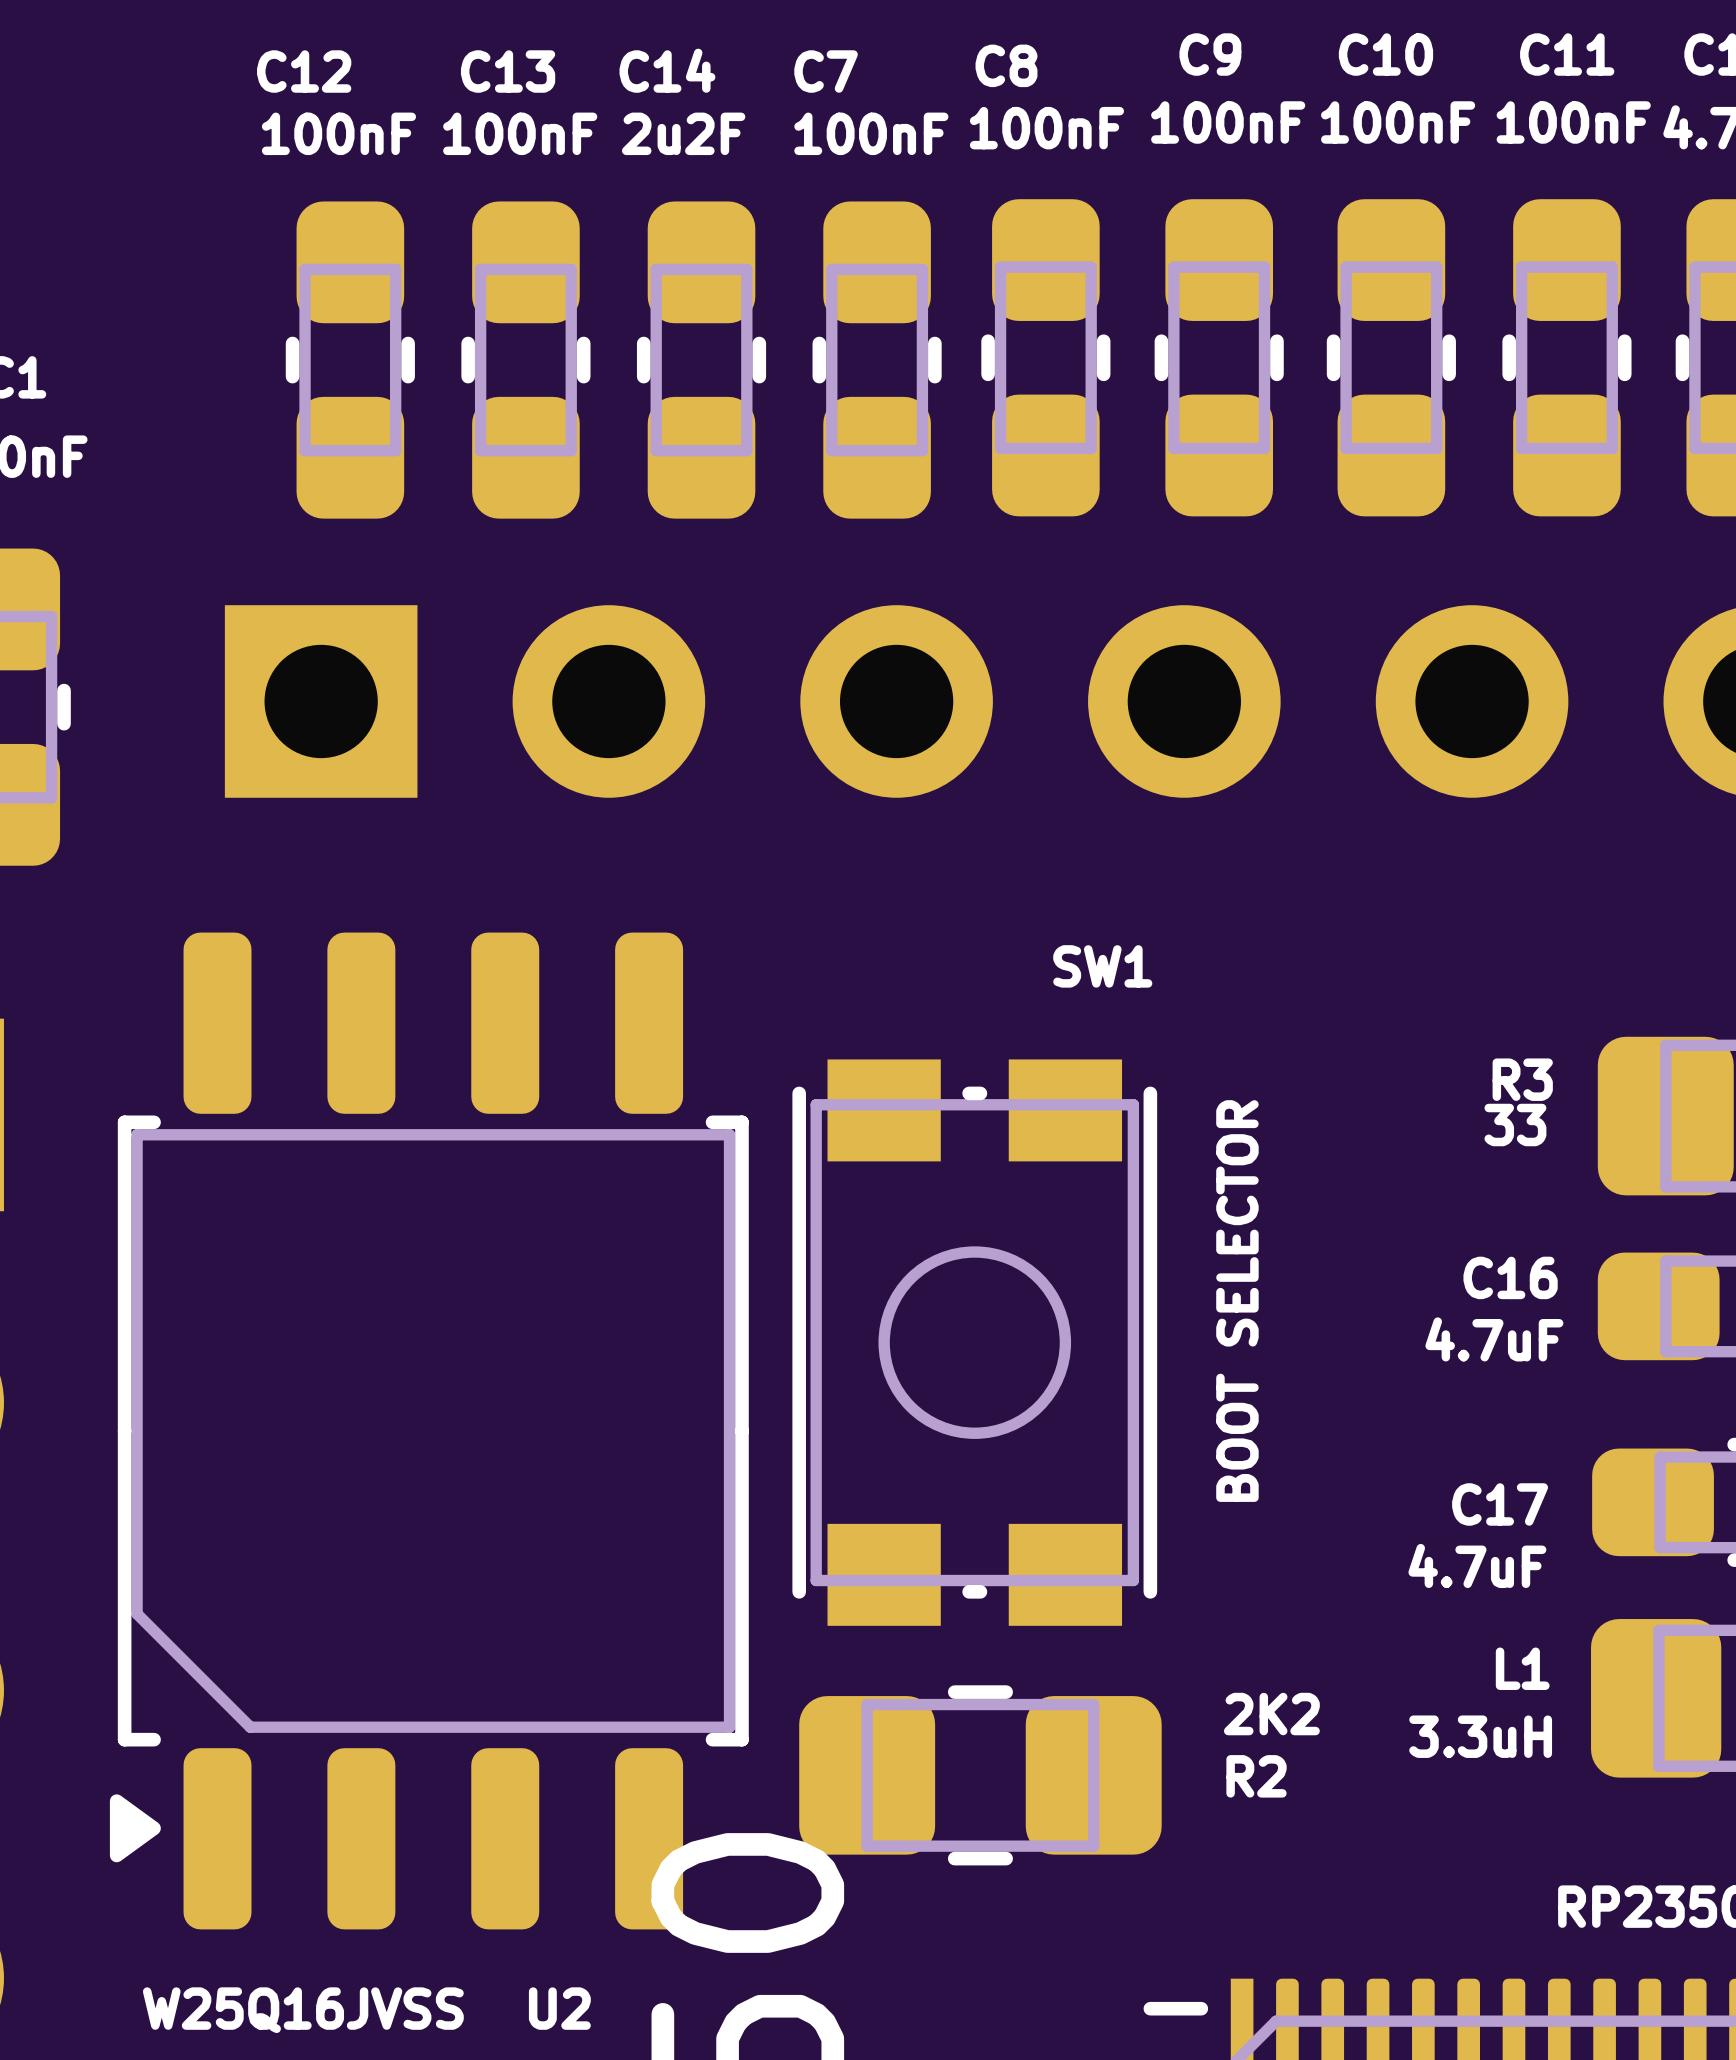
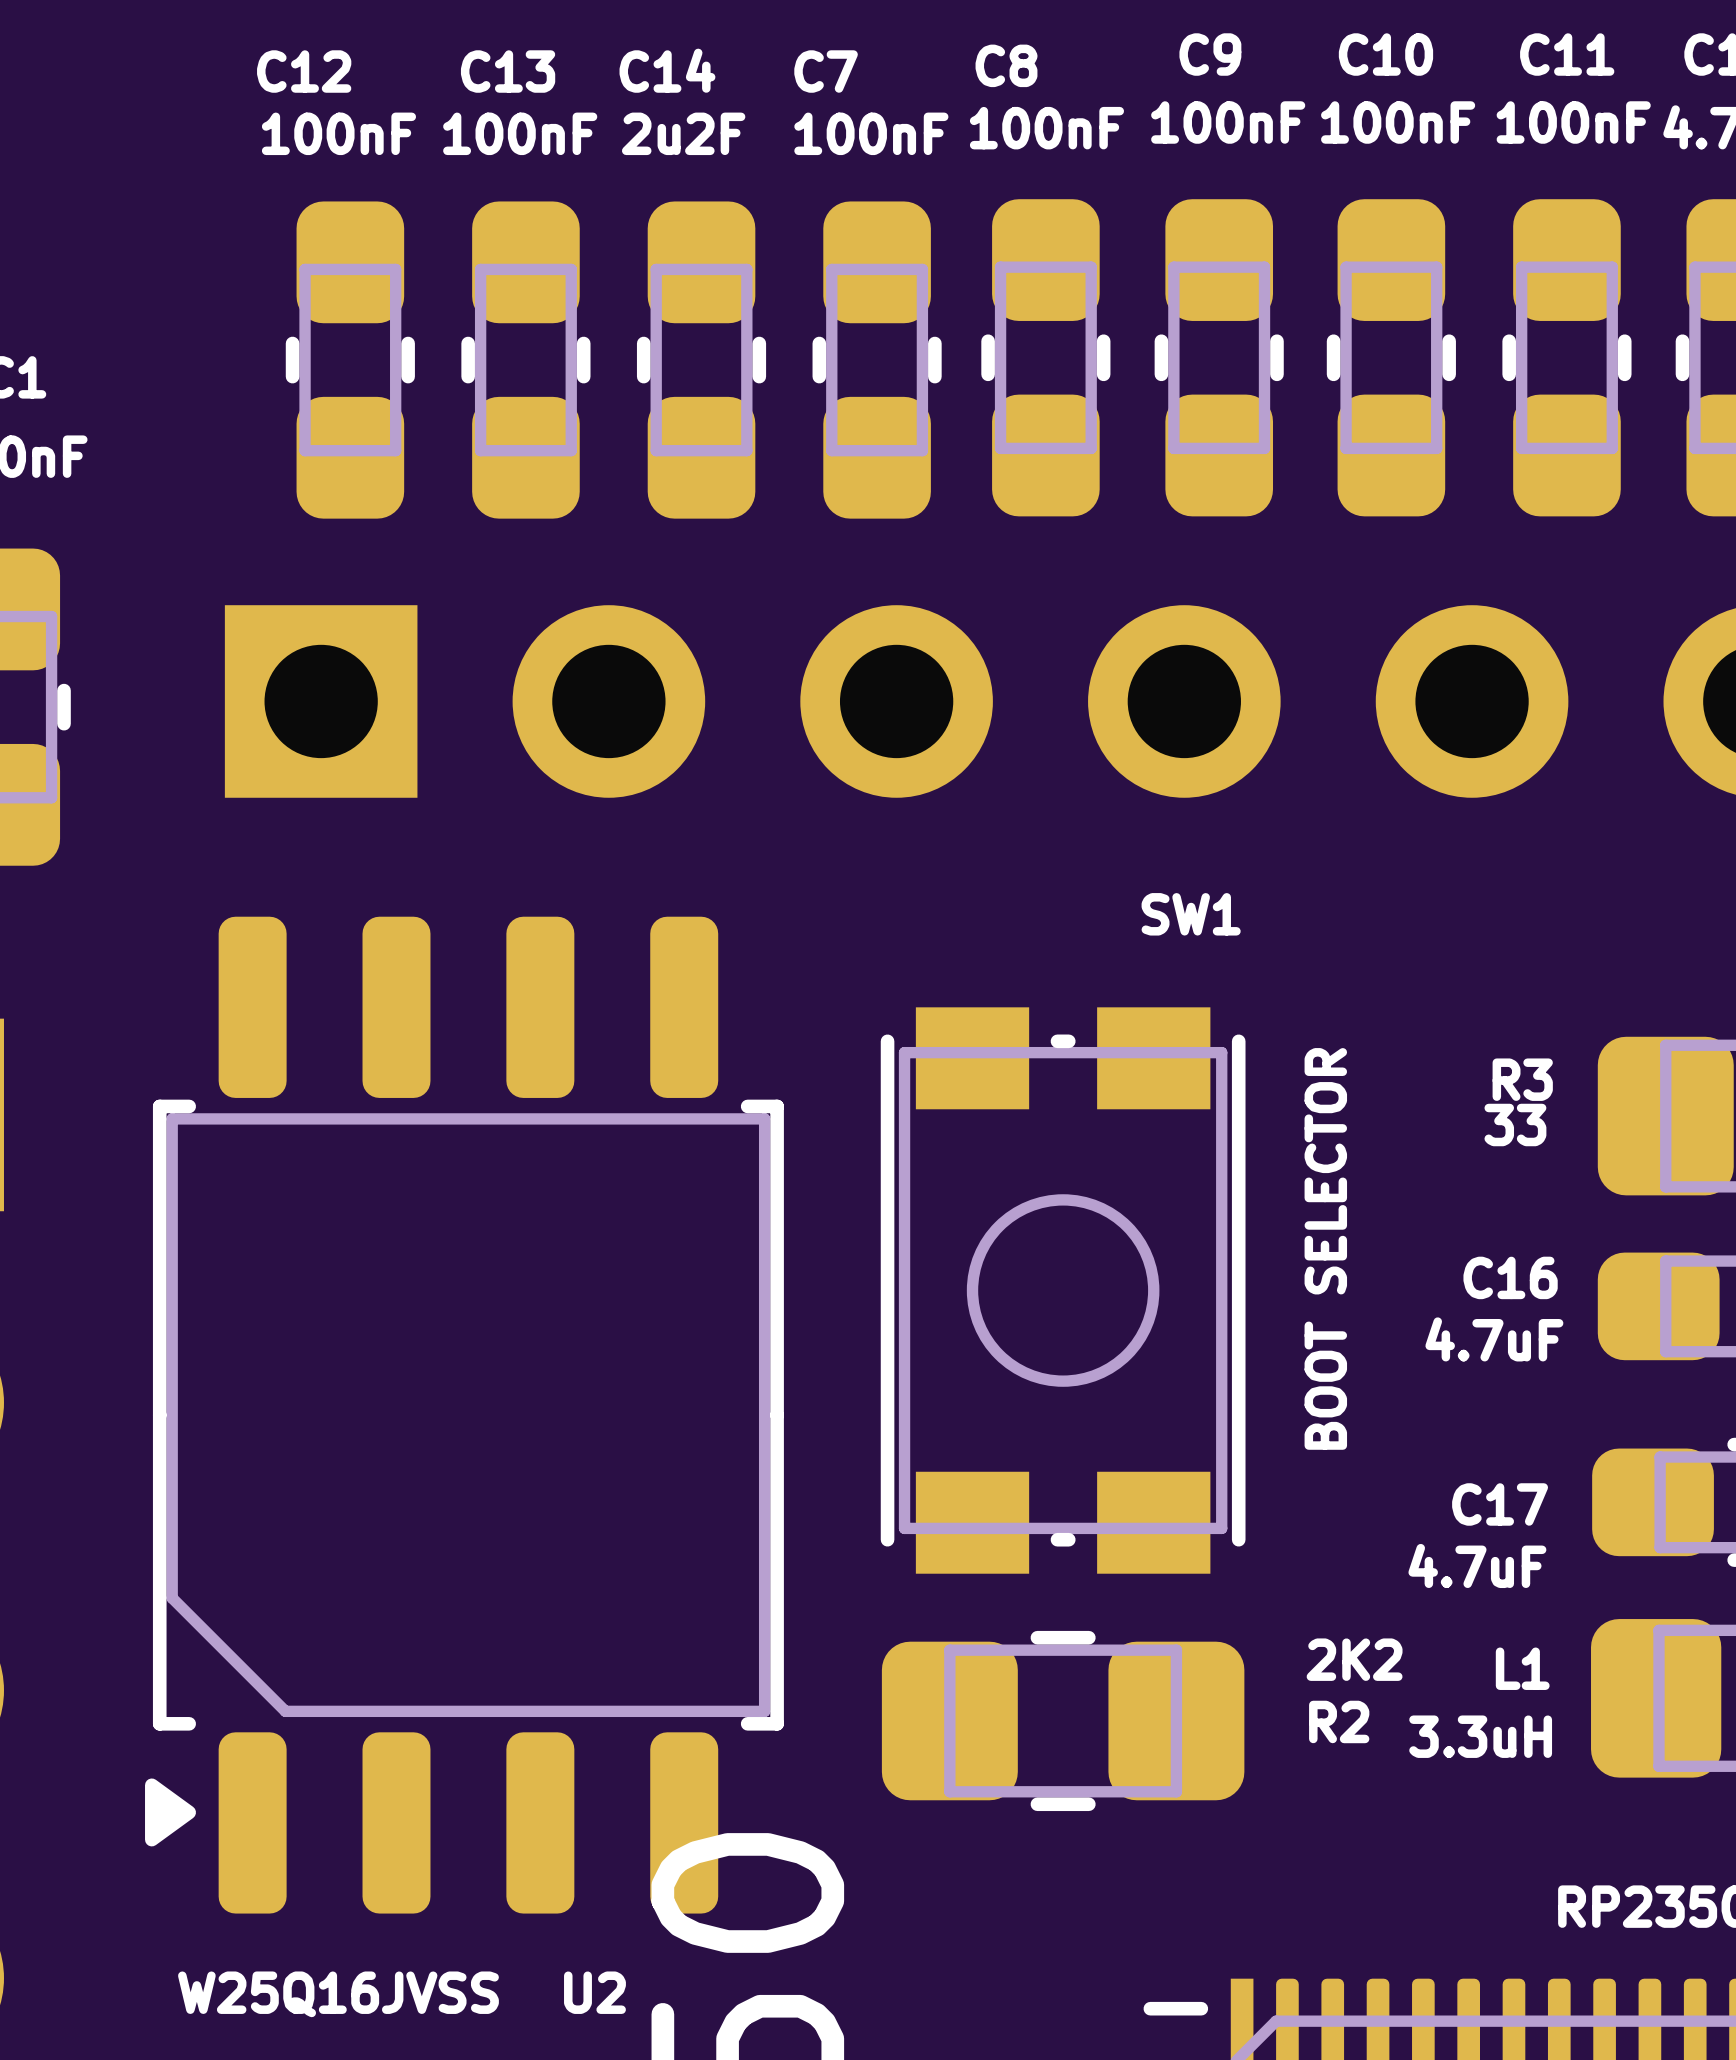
SW1 position: (974, 1342) -> (1063, 1290)
U2 position: (429, 1430) -> (464, 1415)
R2 position: (980, 1775) -> (1063, 1720)

